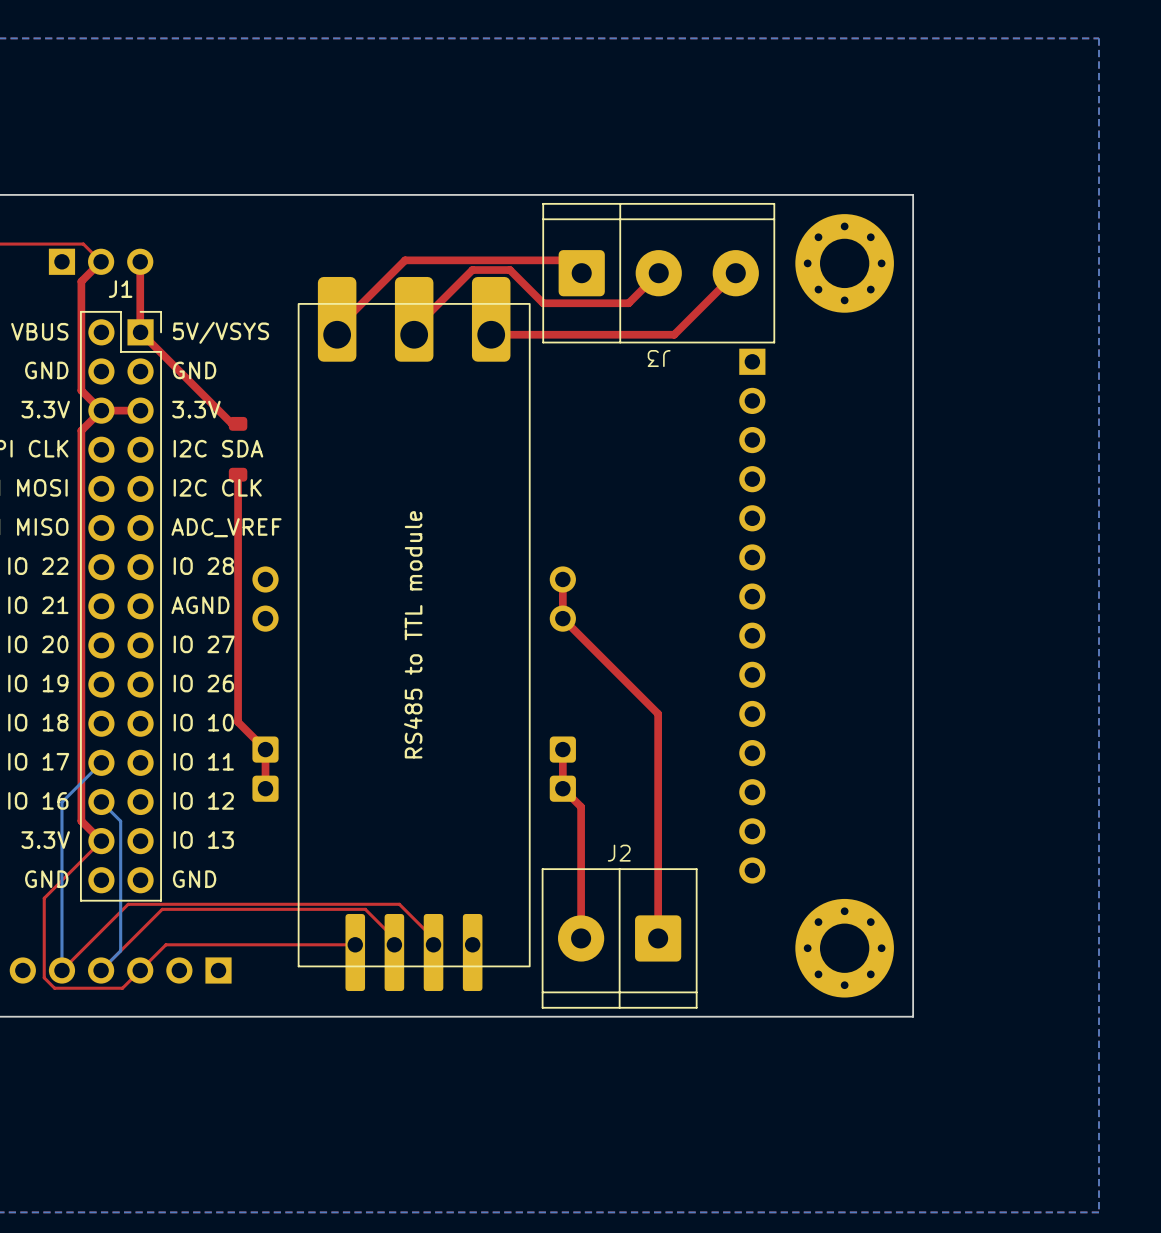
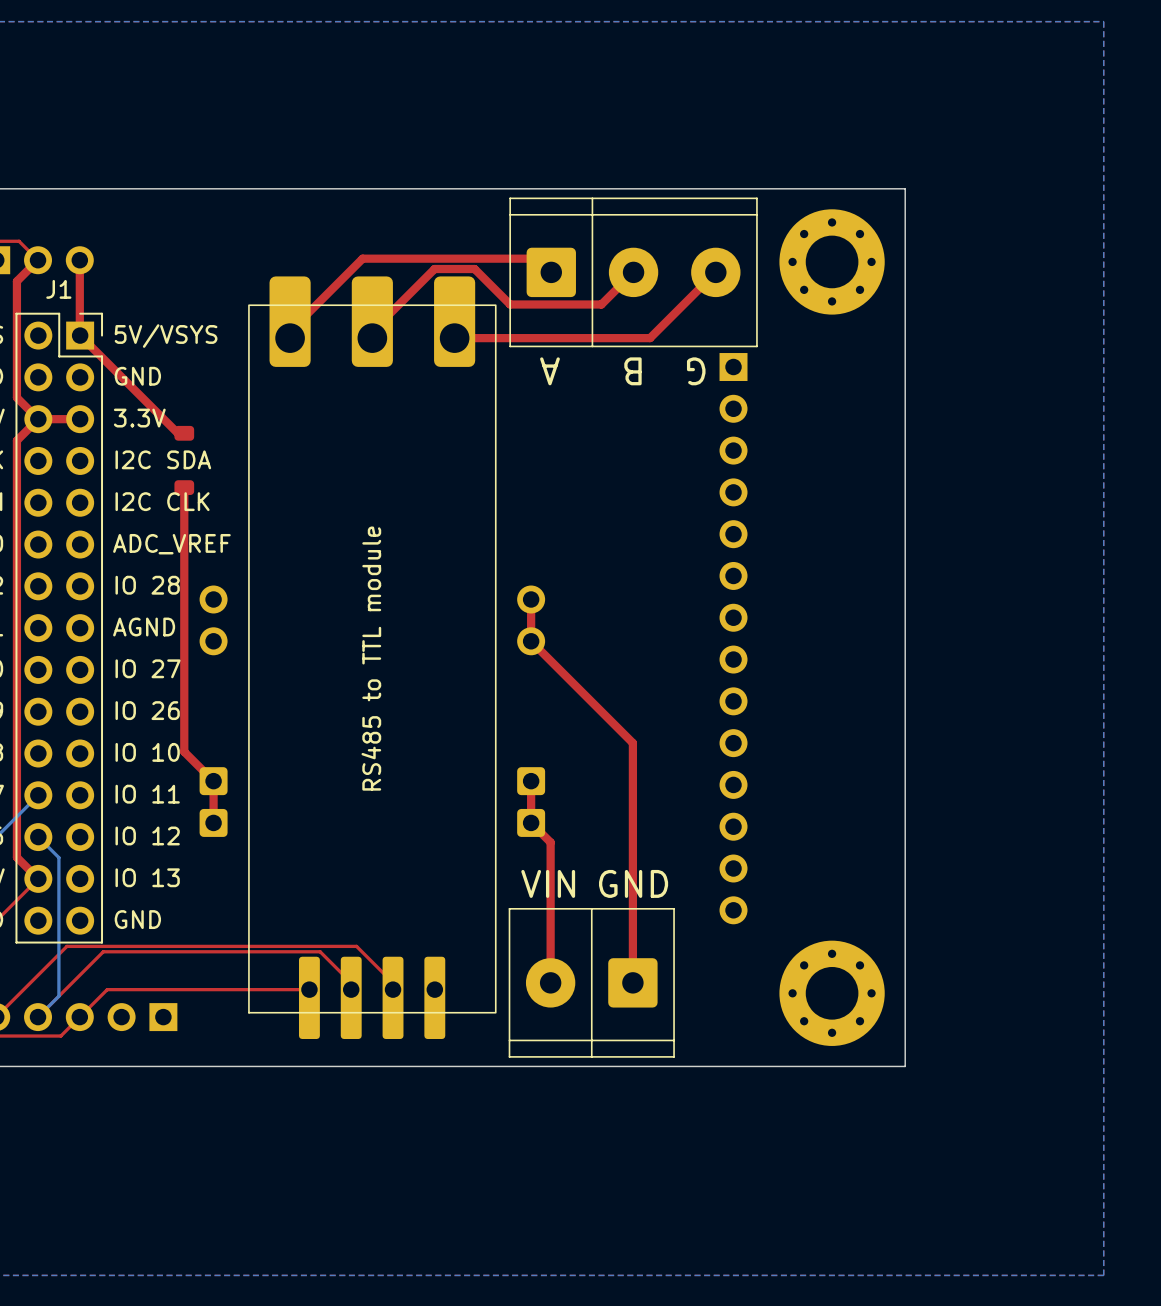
J3 name: J3 (659, 358) -> none
text: none -> A (549, 371)
text: none -> B (632, 371)
text: none -> G (696, 371)
text: none -> VIN (548, 883)
text: none -> GND (633, 883)
J2 name: J2 (619, 853) -> none

